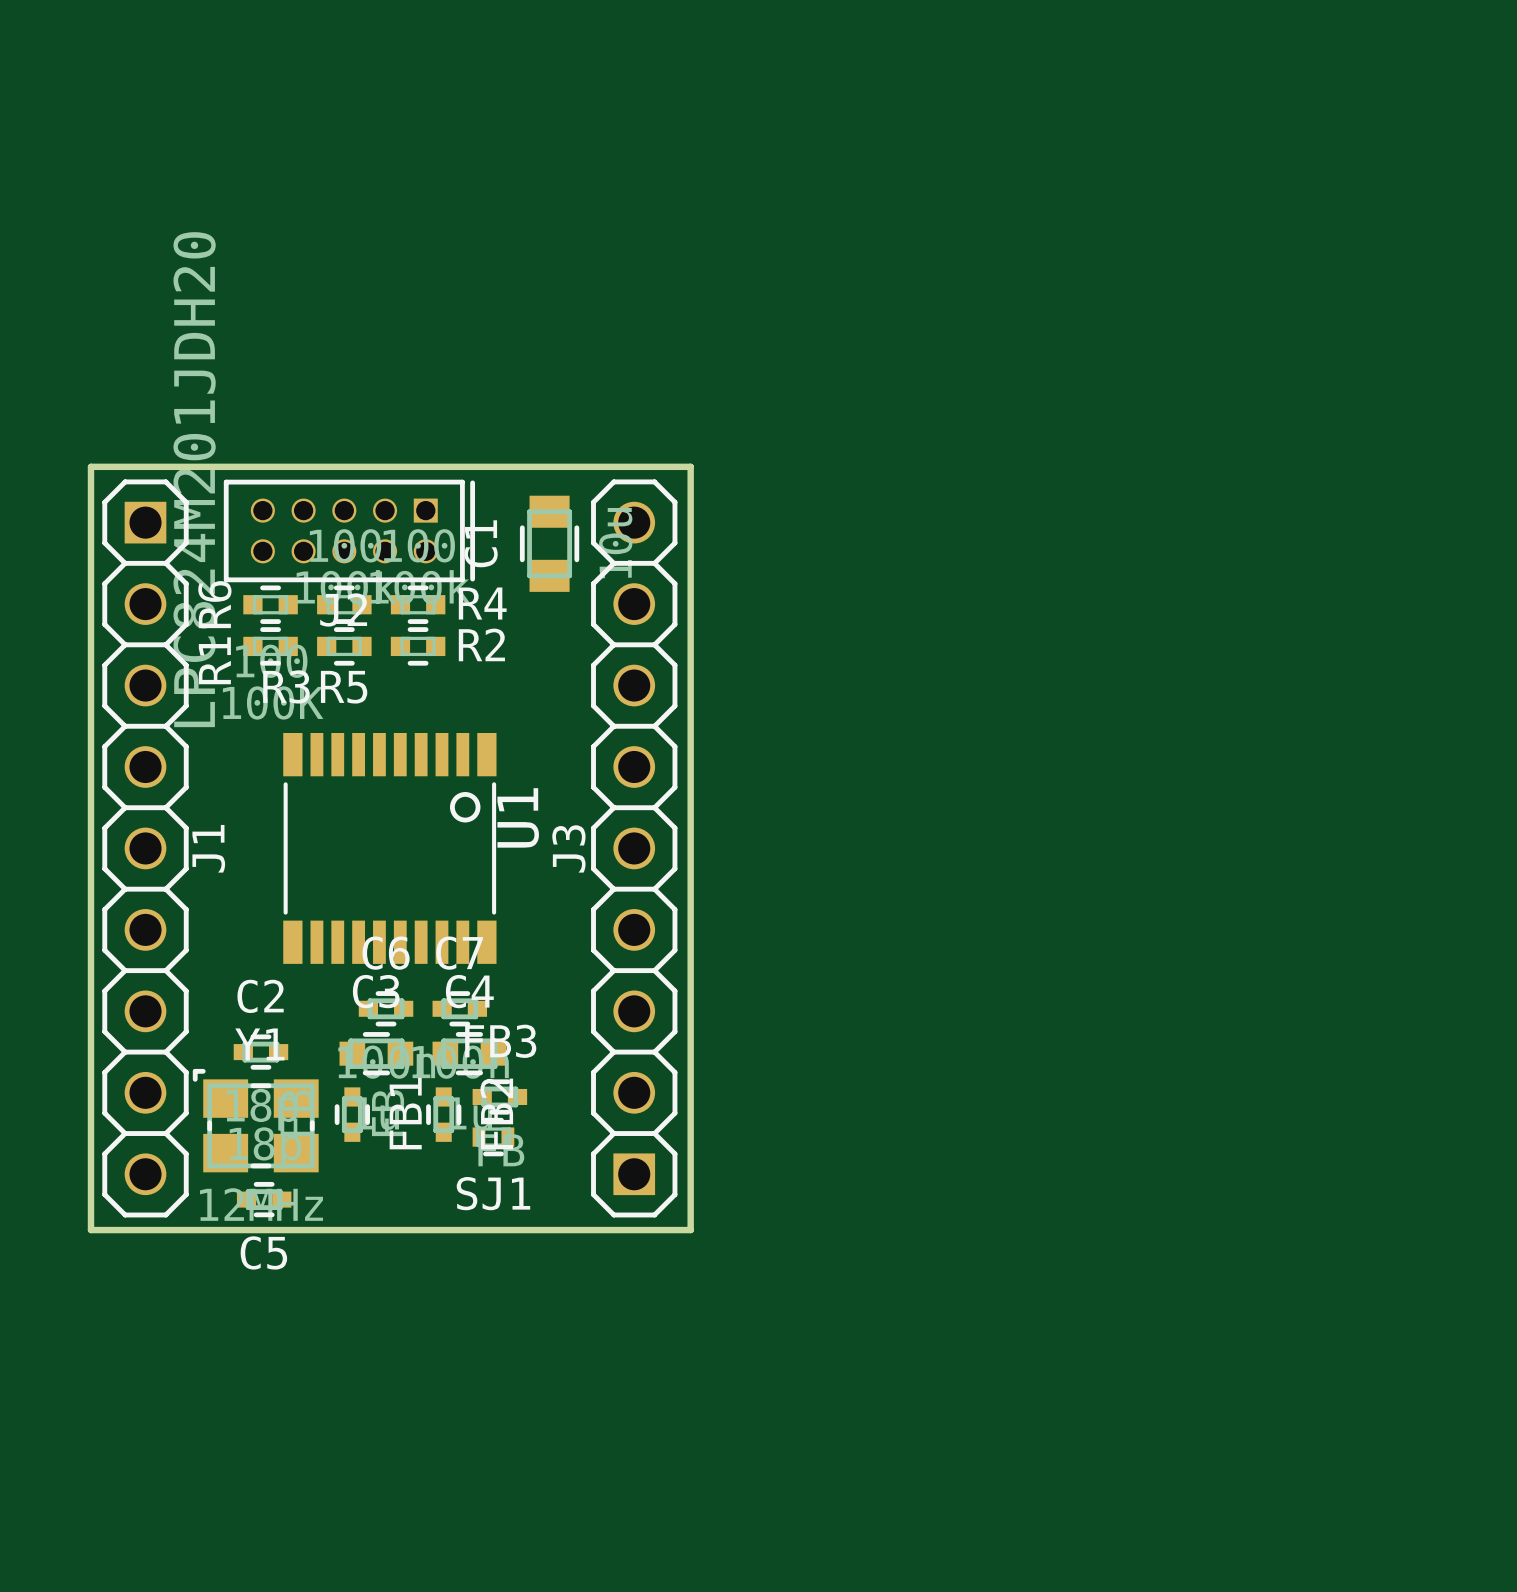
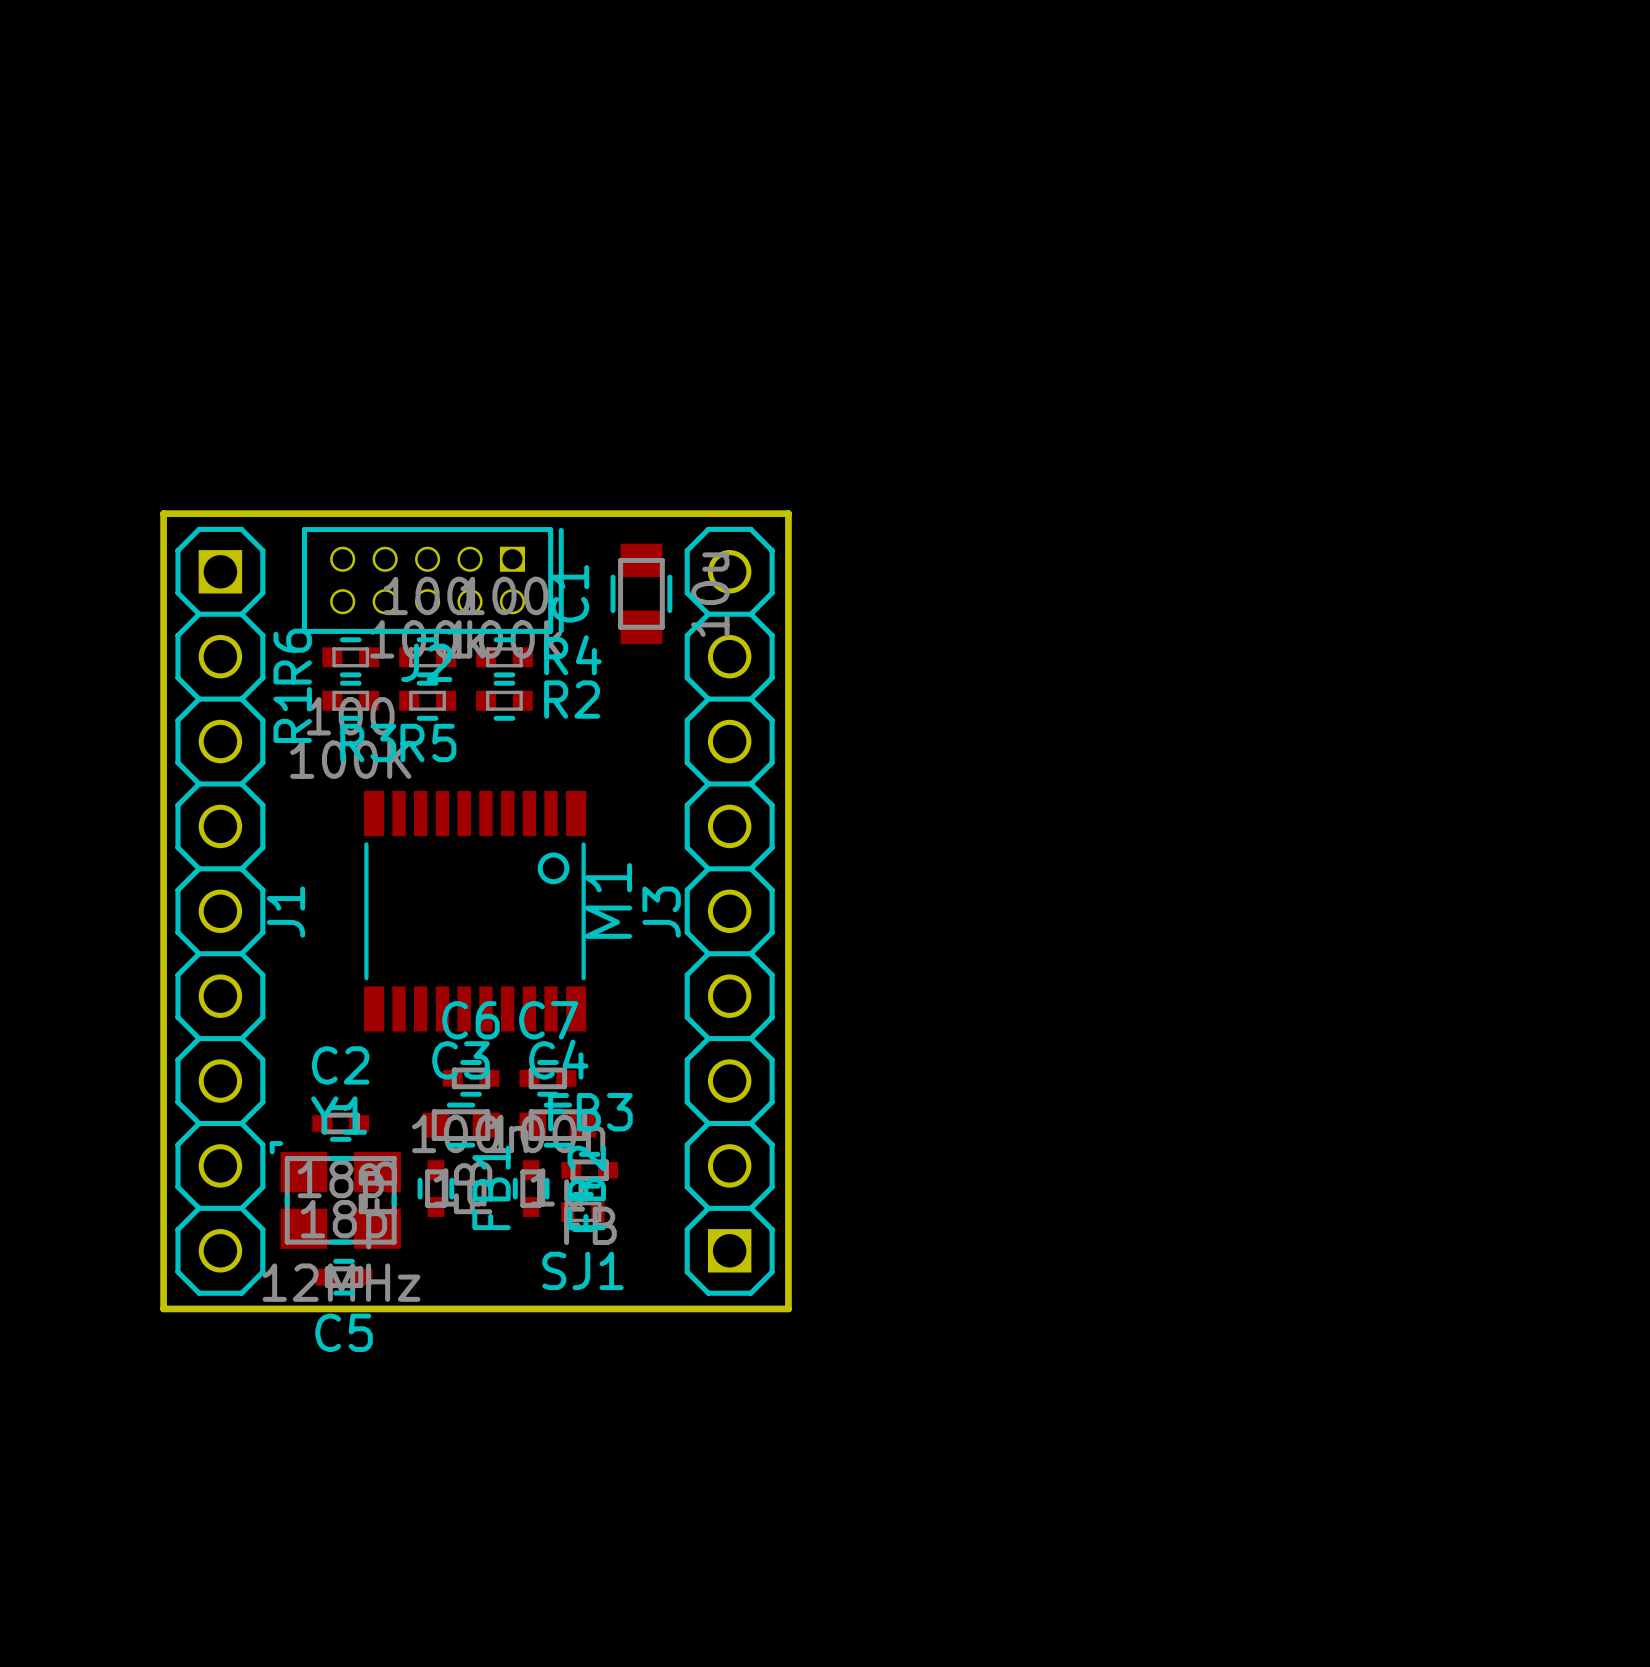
U1 value: LPC824M201JDH20 (194, 479) -> none
U1 name: U1 (518, 817) -> M1 (608, 900)

